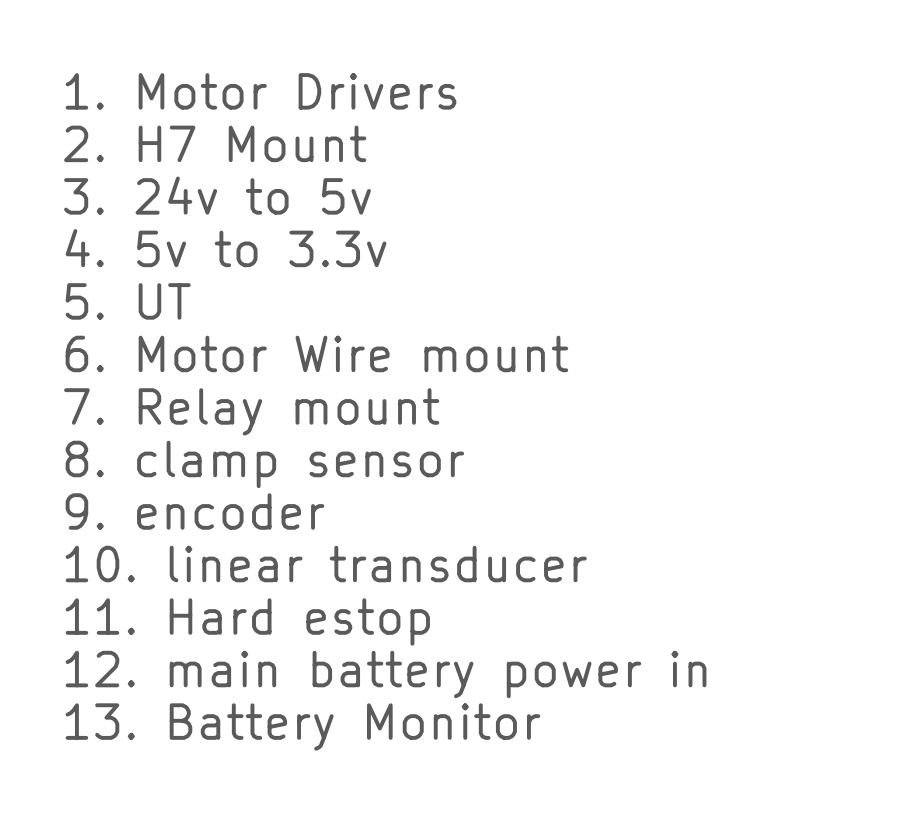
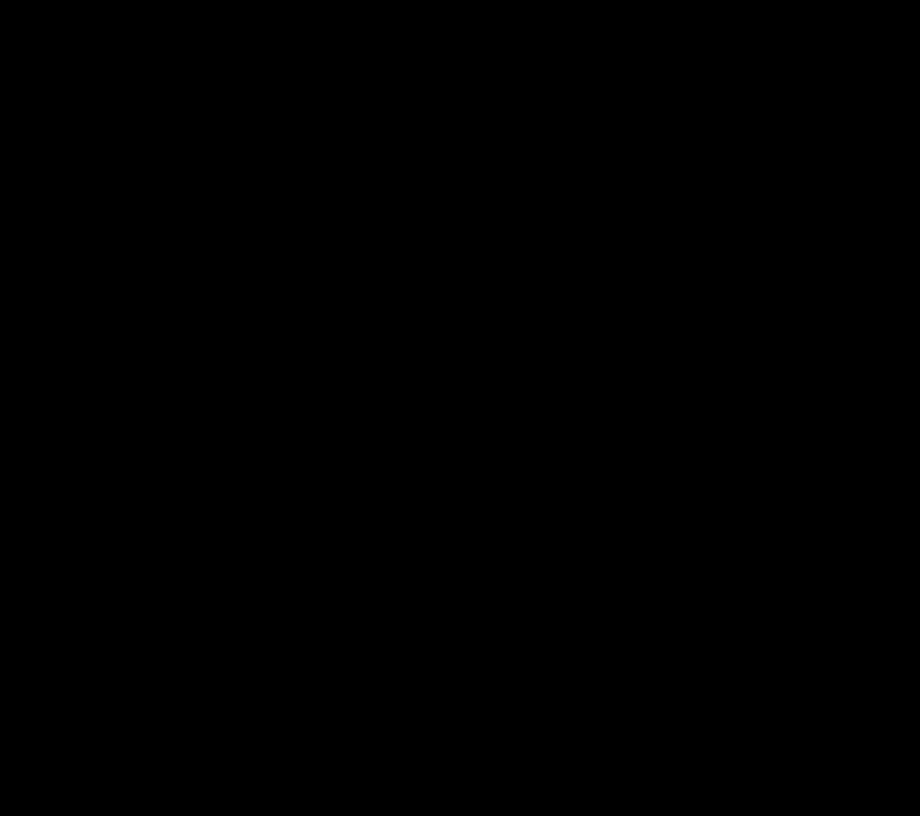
text: 1. Motor Drivers (260, 91) -> none
text: 2. H7 Mount (215, 143) -> none
text: 3. 24v to 5v (217, 195) -> none
text: 4. 5v to 3.3v (226, 248) -> none
text: 5. UT (128, 301) -> none
text: 6. Motor Wire mount (316, 353) -> none
text: 7. Relay mount (251, 411) -> none
text: 8. clamp sensor (264, 464) -> none
text: 9. encoder (194, 511) -> none
text: 10. linear transducer (326, 564) -> none
text: 11. Hard estop (247, 621) -> none
text: 12. main battery power in (386, 674) -> none
text: 13. Battery Monitor (302, 727) -> none

